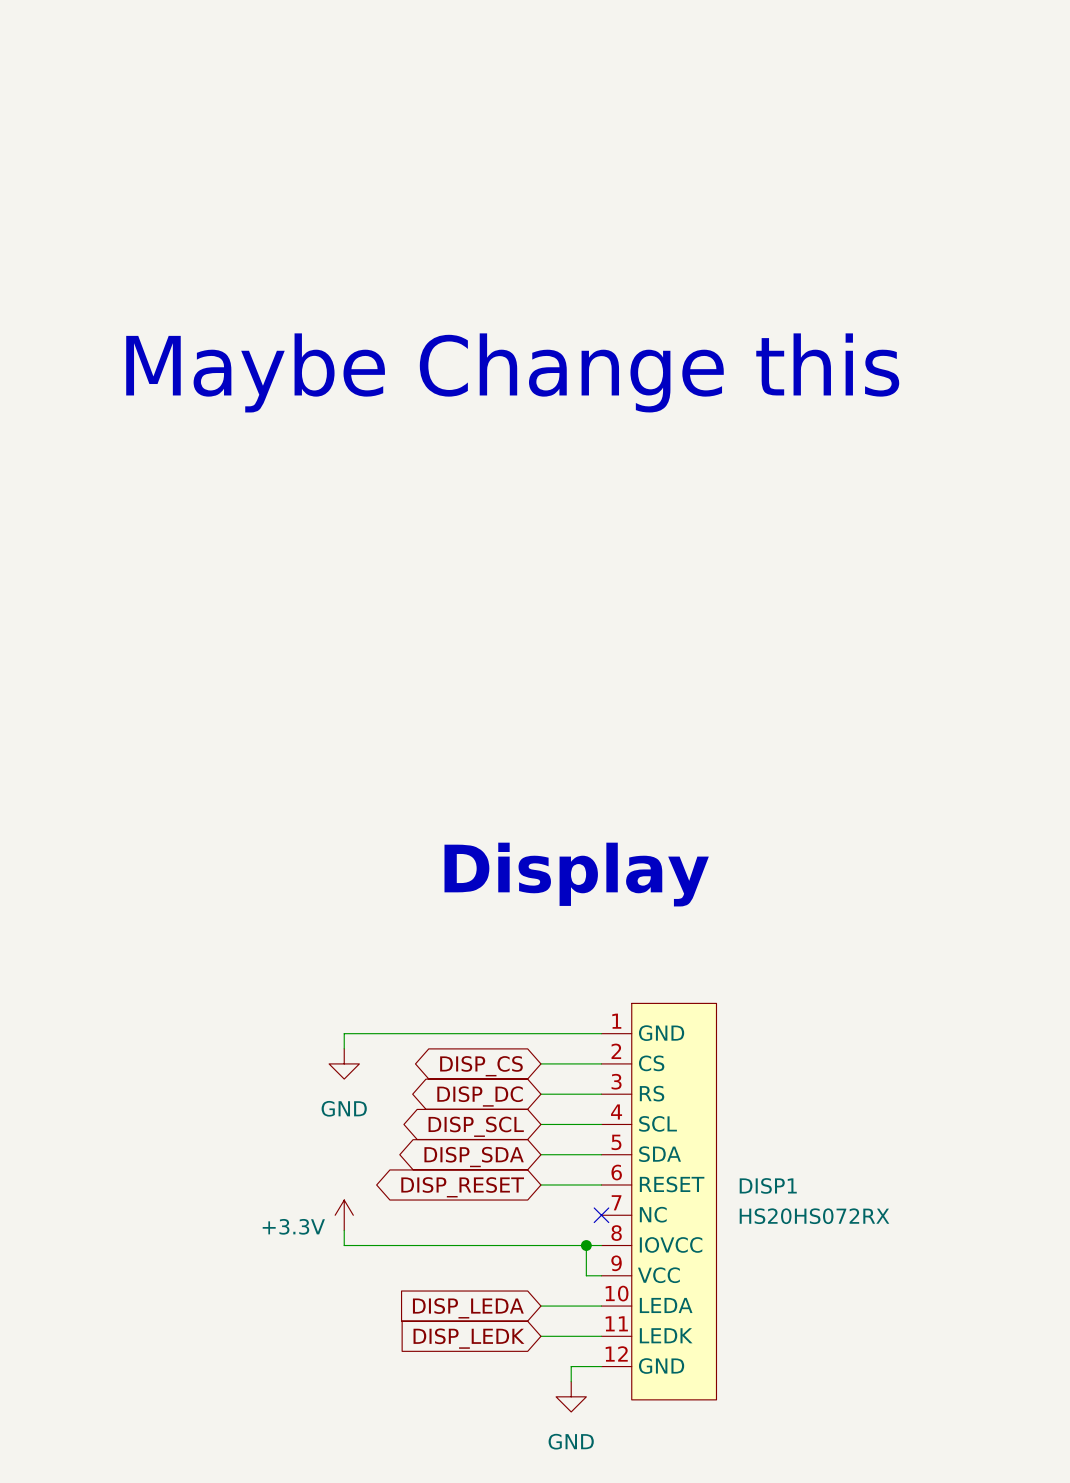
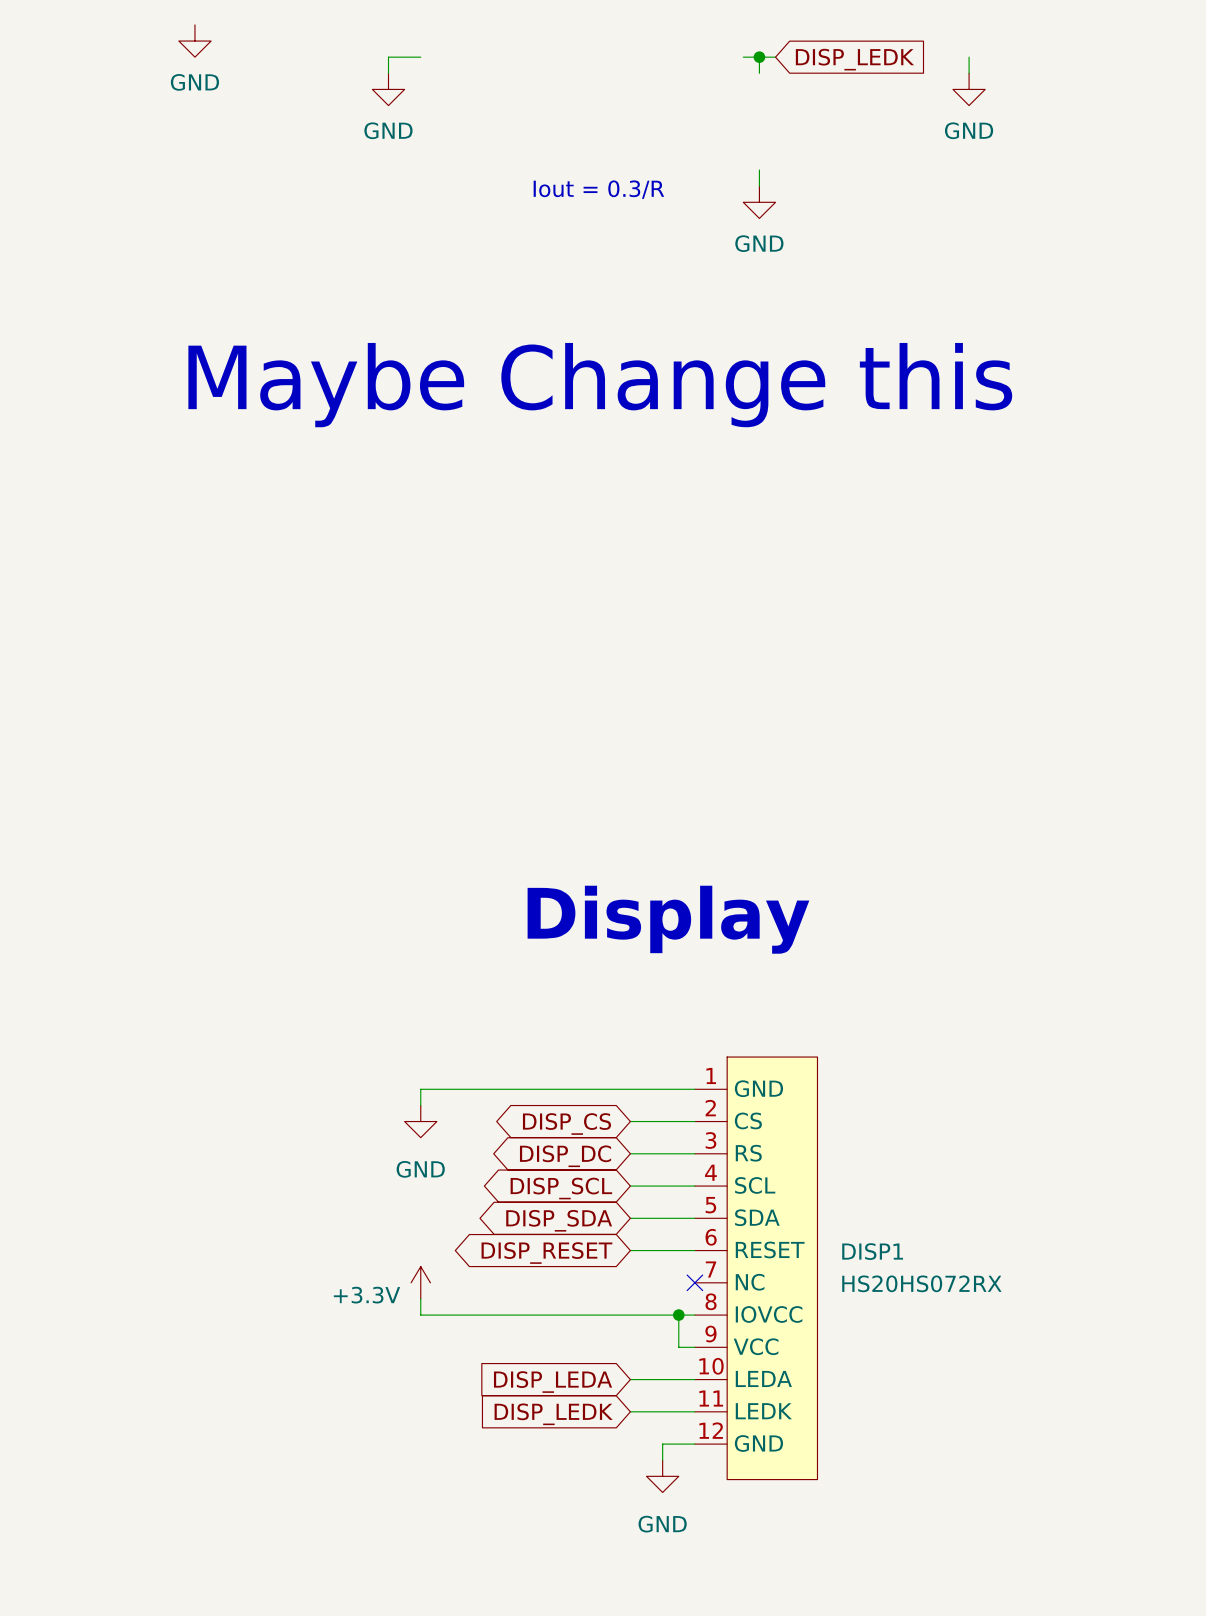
power symbol: none -> GND (194, 41)
wire: none -> (420, 57) (388, 57) (388, 73)
wire: none -> (743, 57) (775, 57)
wire: none -> (759, 57) (759, 73)
junction: none -> (759, 57)
wire: none -> (969, 57) (969, 73)
global label: none -> DISP_LEDK (854, 59)
power symbol: none -> GND (388, 89)
power symbol: none -> GND (969, 89)
wire: none -> (759, 170) (759, 186)
text: none -> Iout = 0.3/R (598, 189)
power symbol: none -> GND (759, 202)

